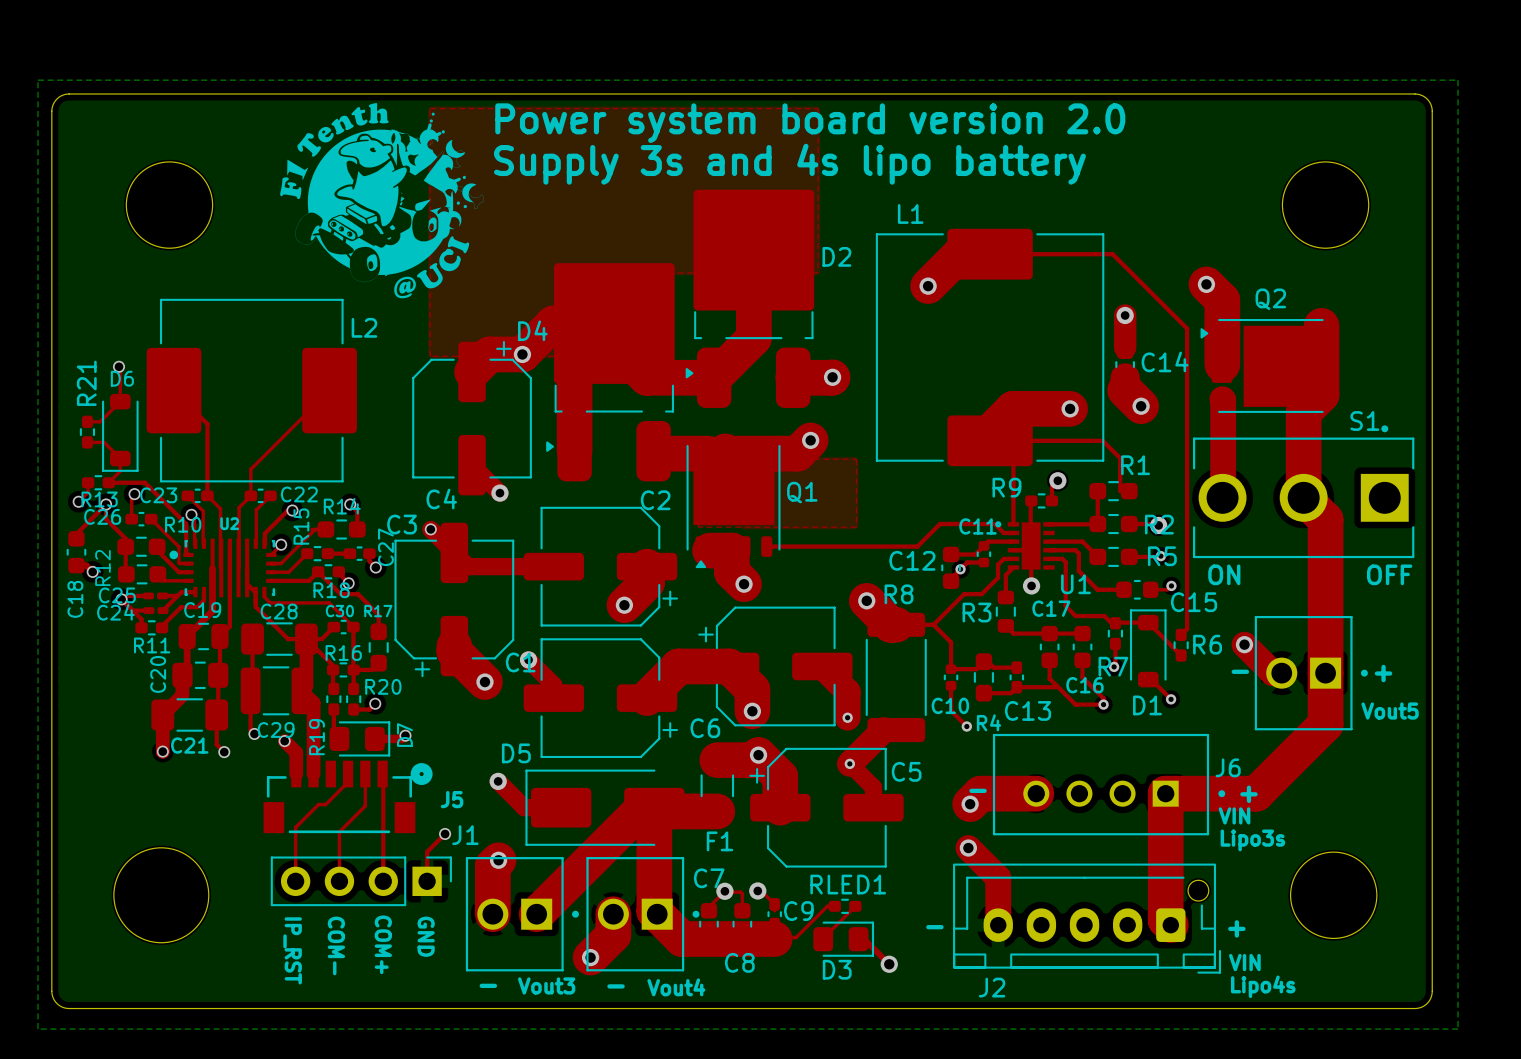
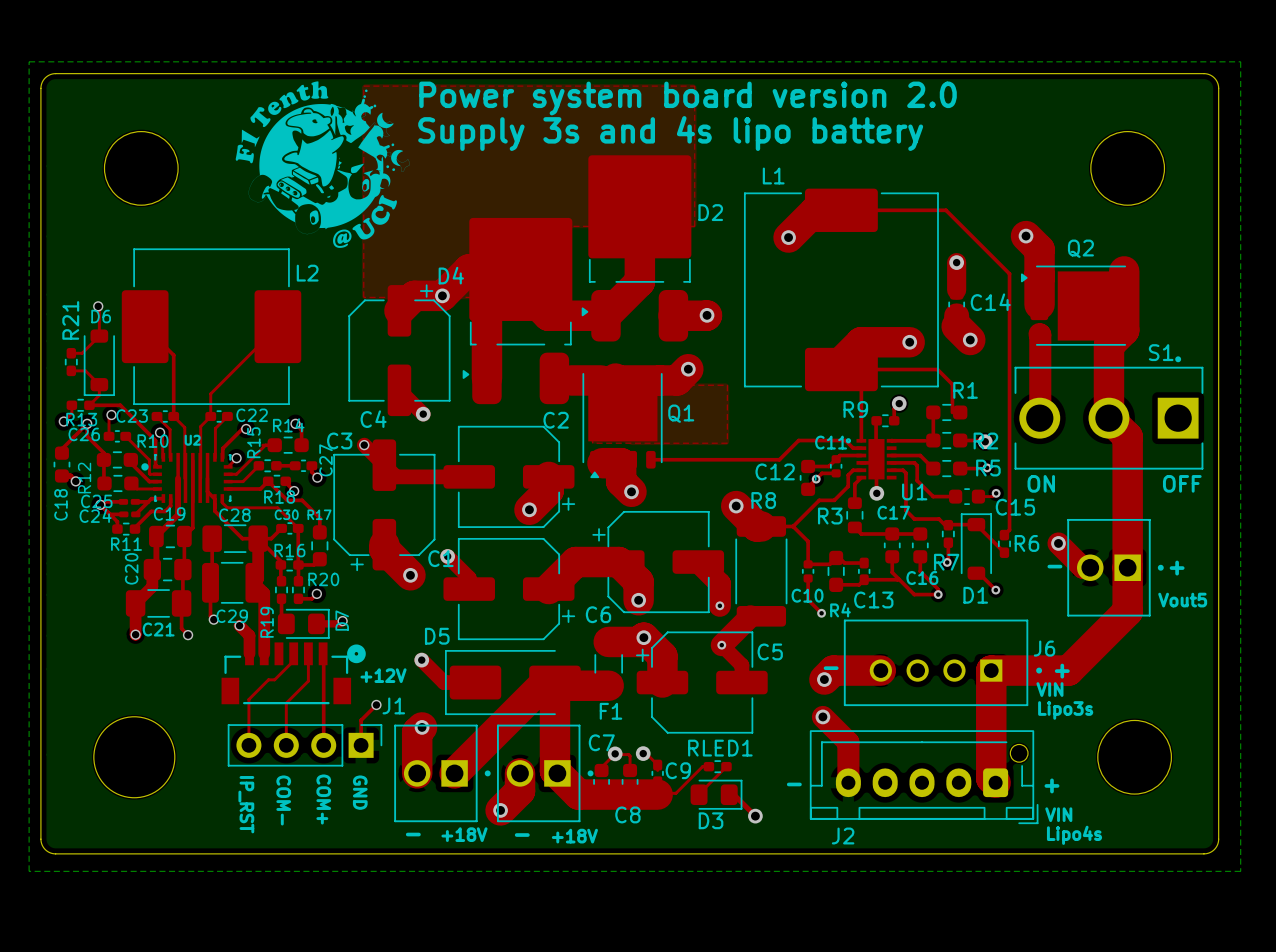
J5 name: J5 (452, 799) -> +12V (383, 675)
Vout3 name: Vout3 (546, 985) -> +18V (464, 834)
Vout4 name: Vout4 (676, 987) -> +18V (574, 836)

